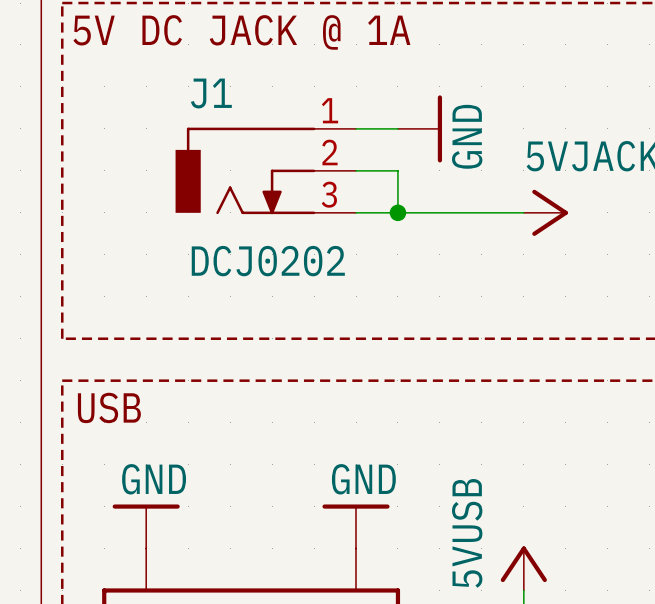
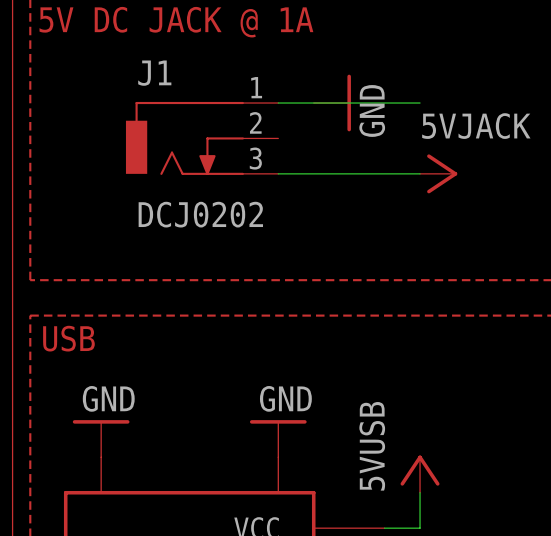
wire: none -> (313, 103) (420, 103)
wire: (356, 170) (397, 170) (397, 212) -> none
junction: (397, 212) -> none

